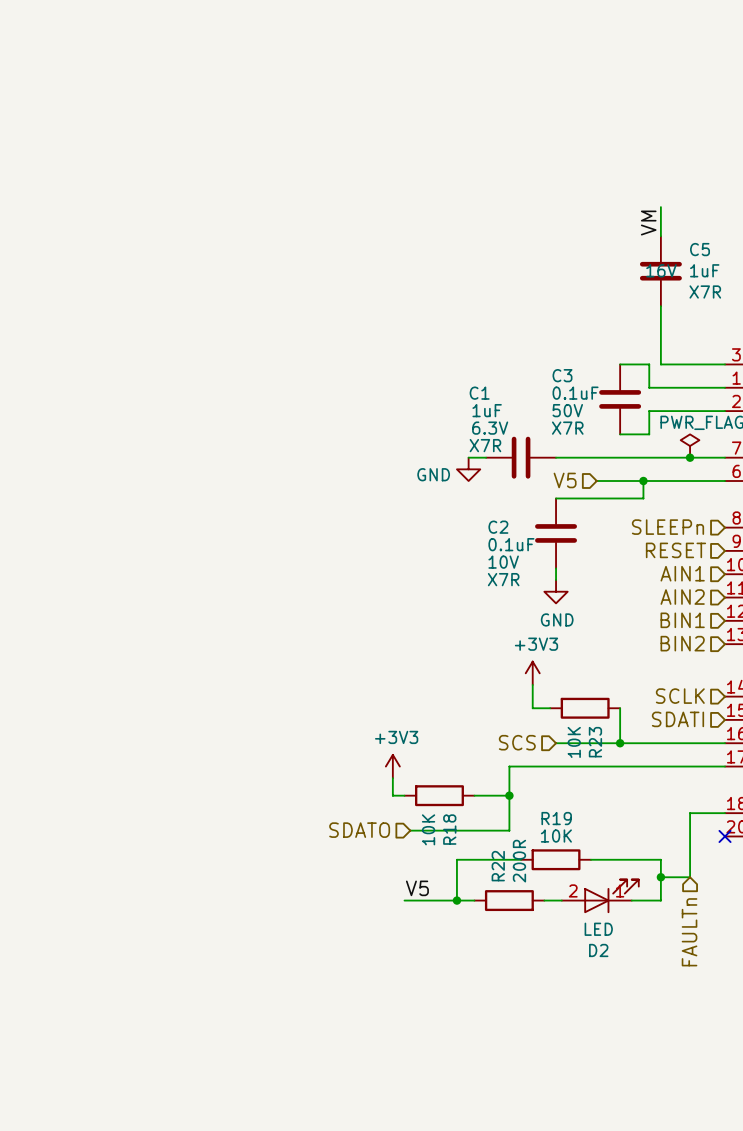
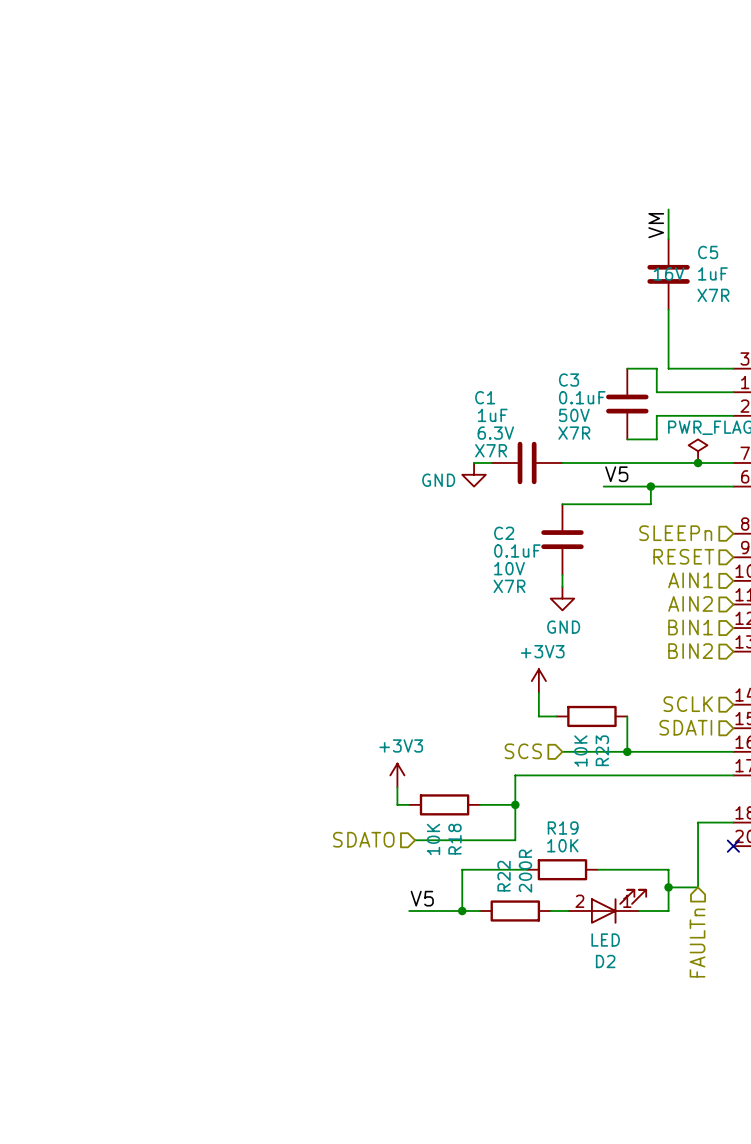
label: none -> V5 (616, 474)
hierarchical label: V5 (565, 480) -> none

